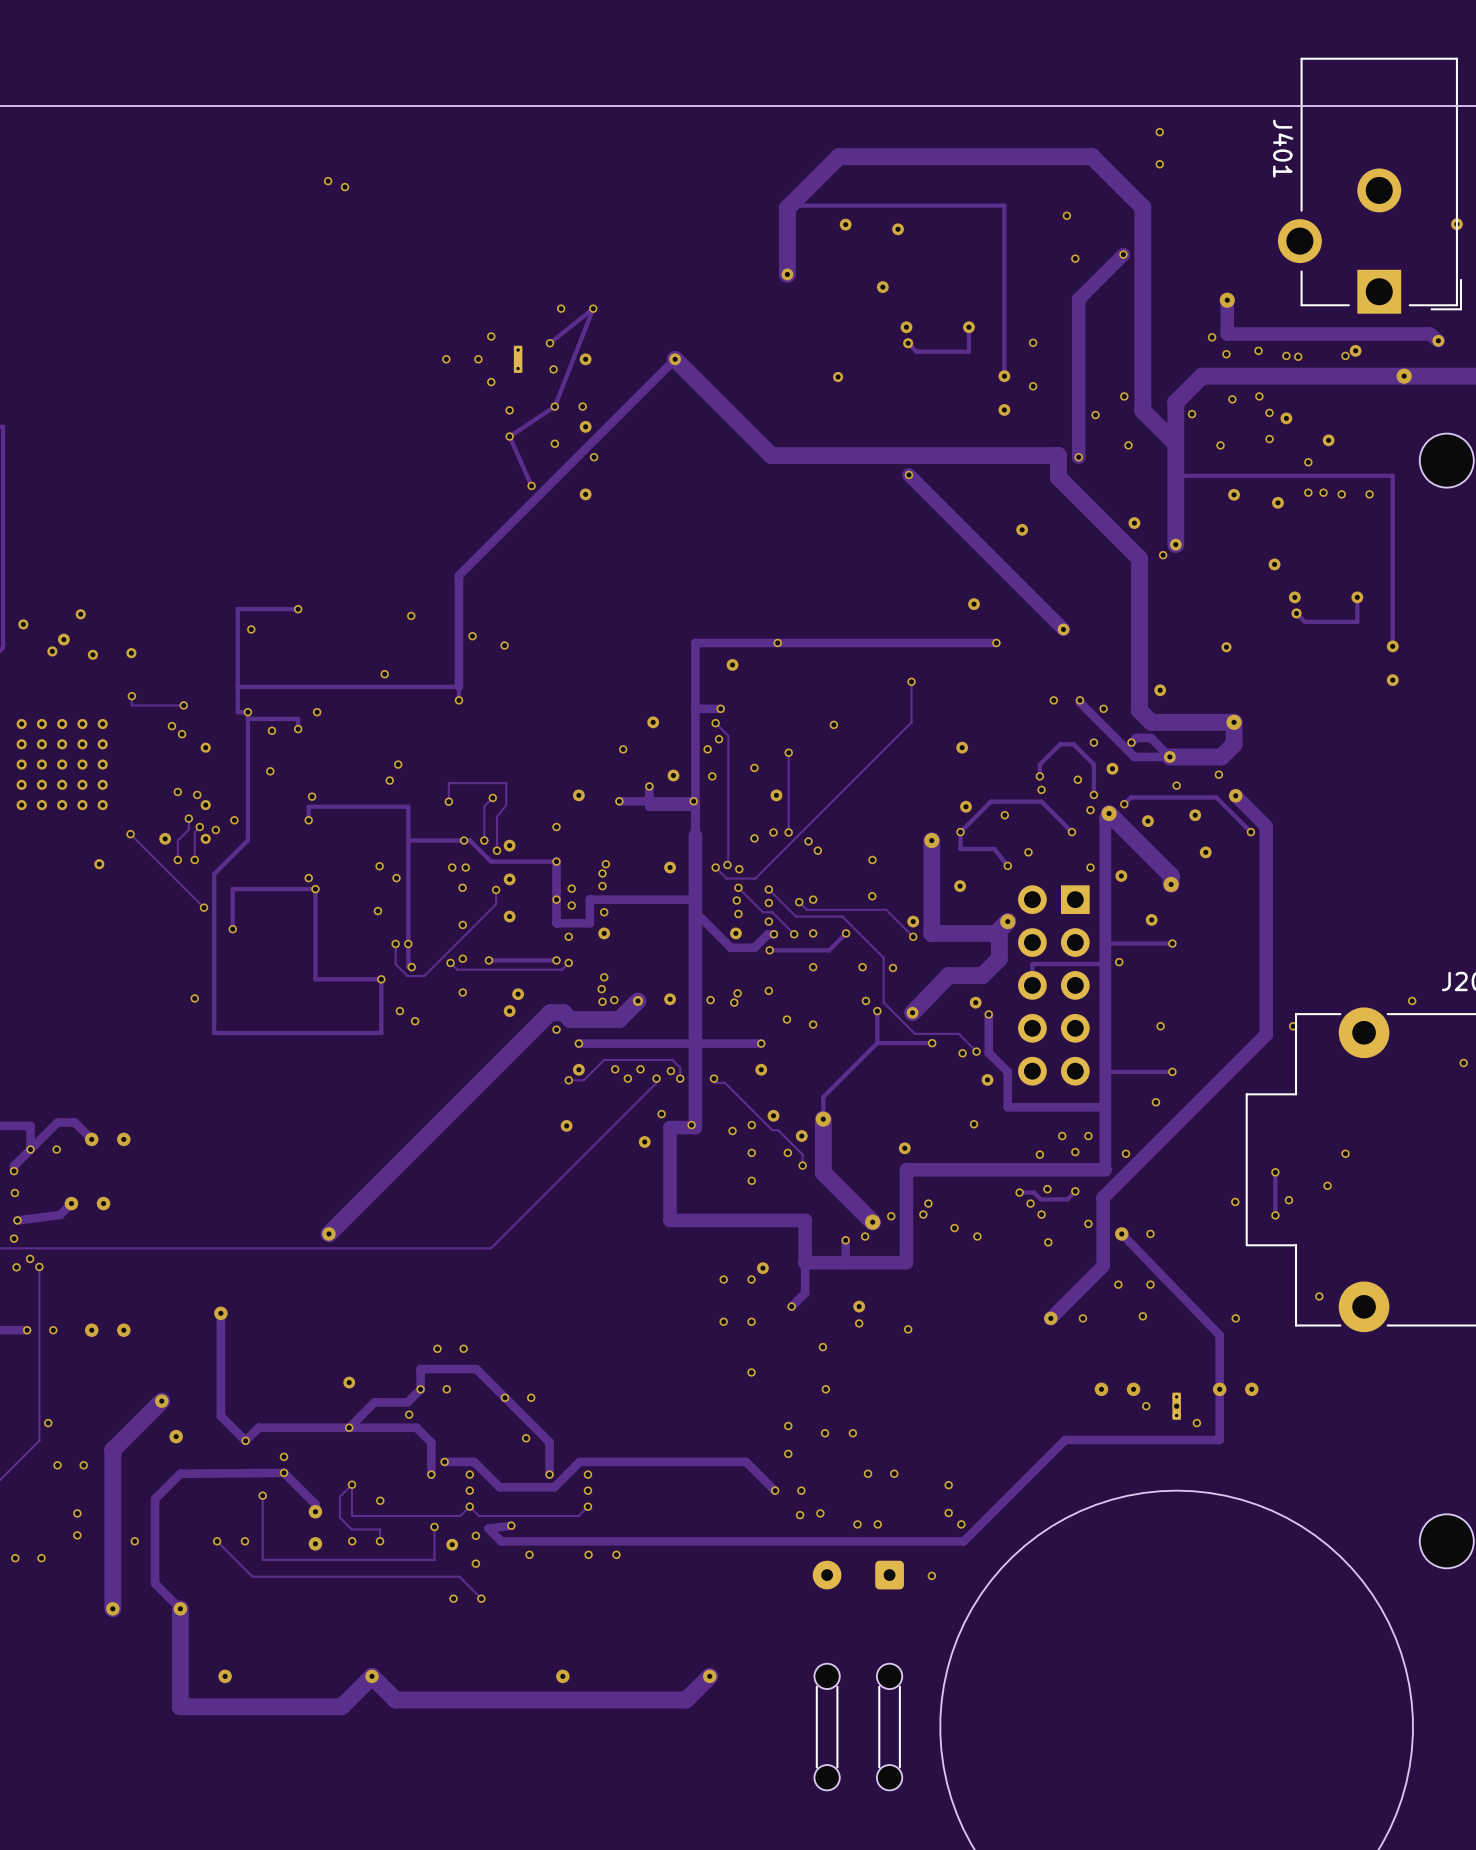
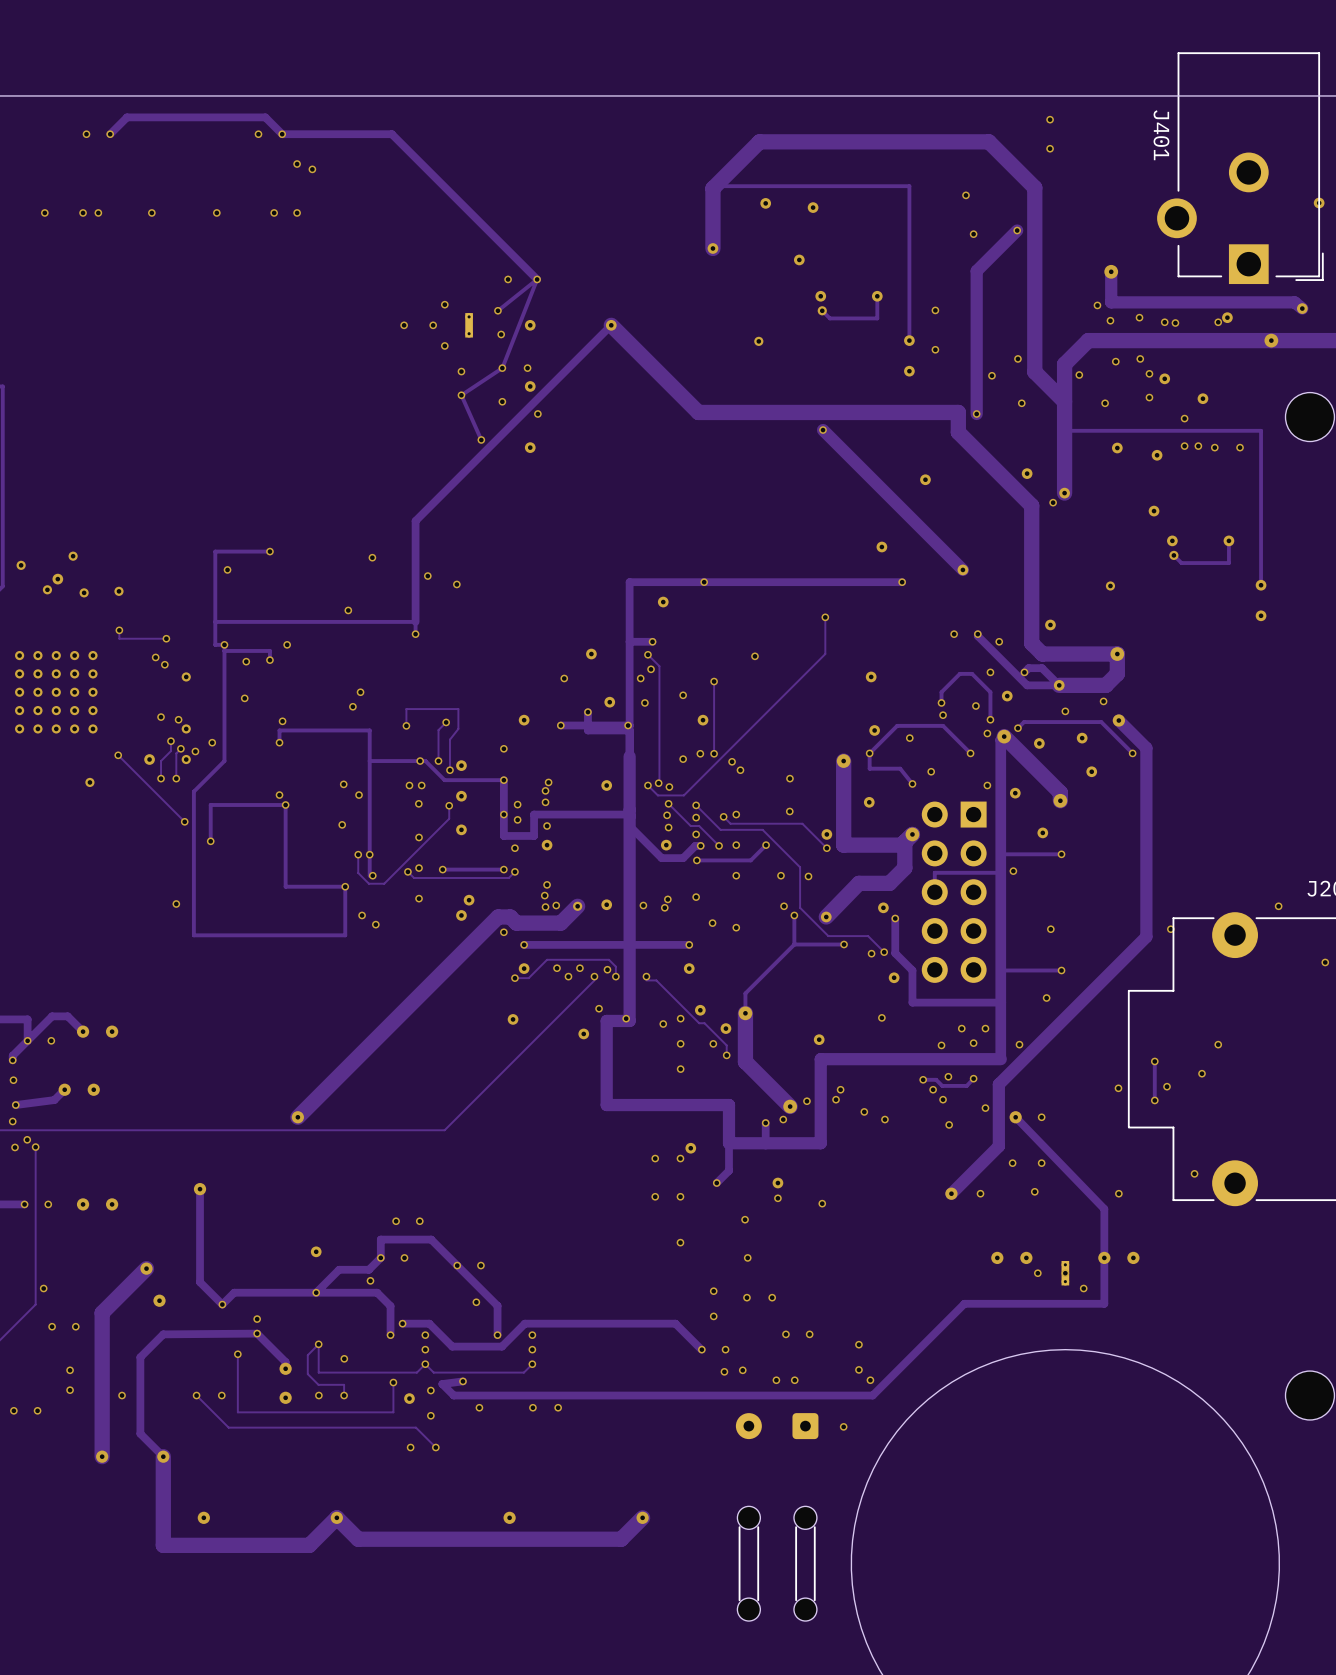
via: none -> (86, 134)
track: none -> (110, 134) (127, 117) (265, 117) (282, 134) (391, 134) (537, 279)
via: none -> (110, 134)
via: none -> (258, 134)
via: none -> (282, 134)
via: none -> (44, 212)
via: none -> (83, 212)
via: none -> (98, 212)
via: none -> (151, 212)
via: none -> (216, 212)
via: none -> (274, 212)
via: none -> (297, 212)

